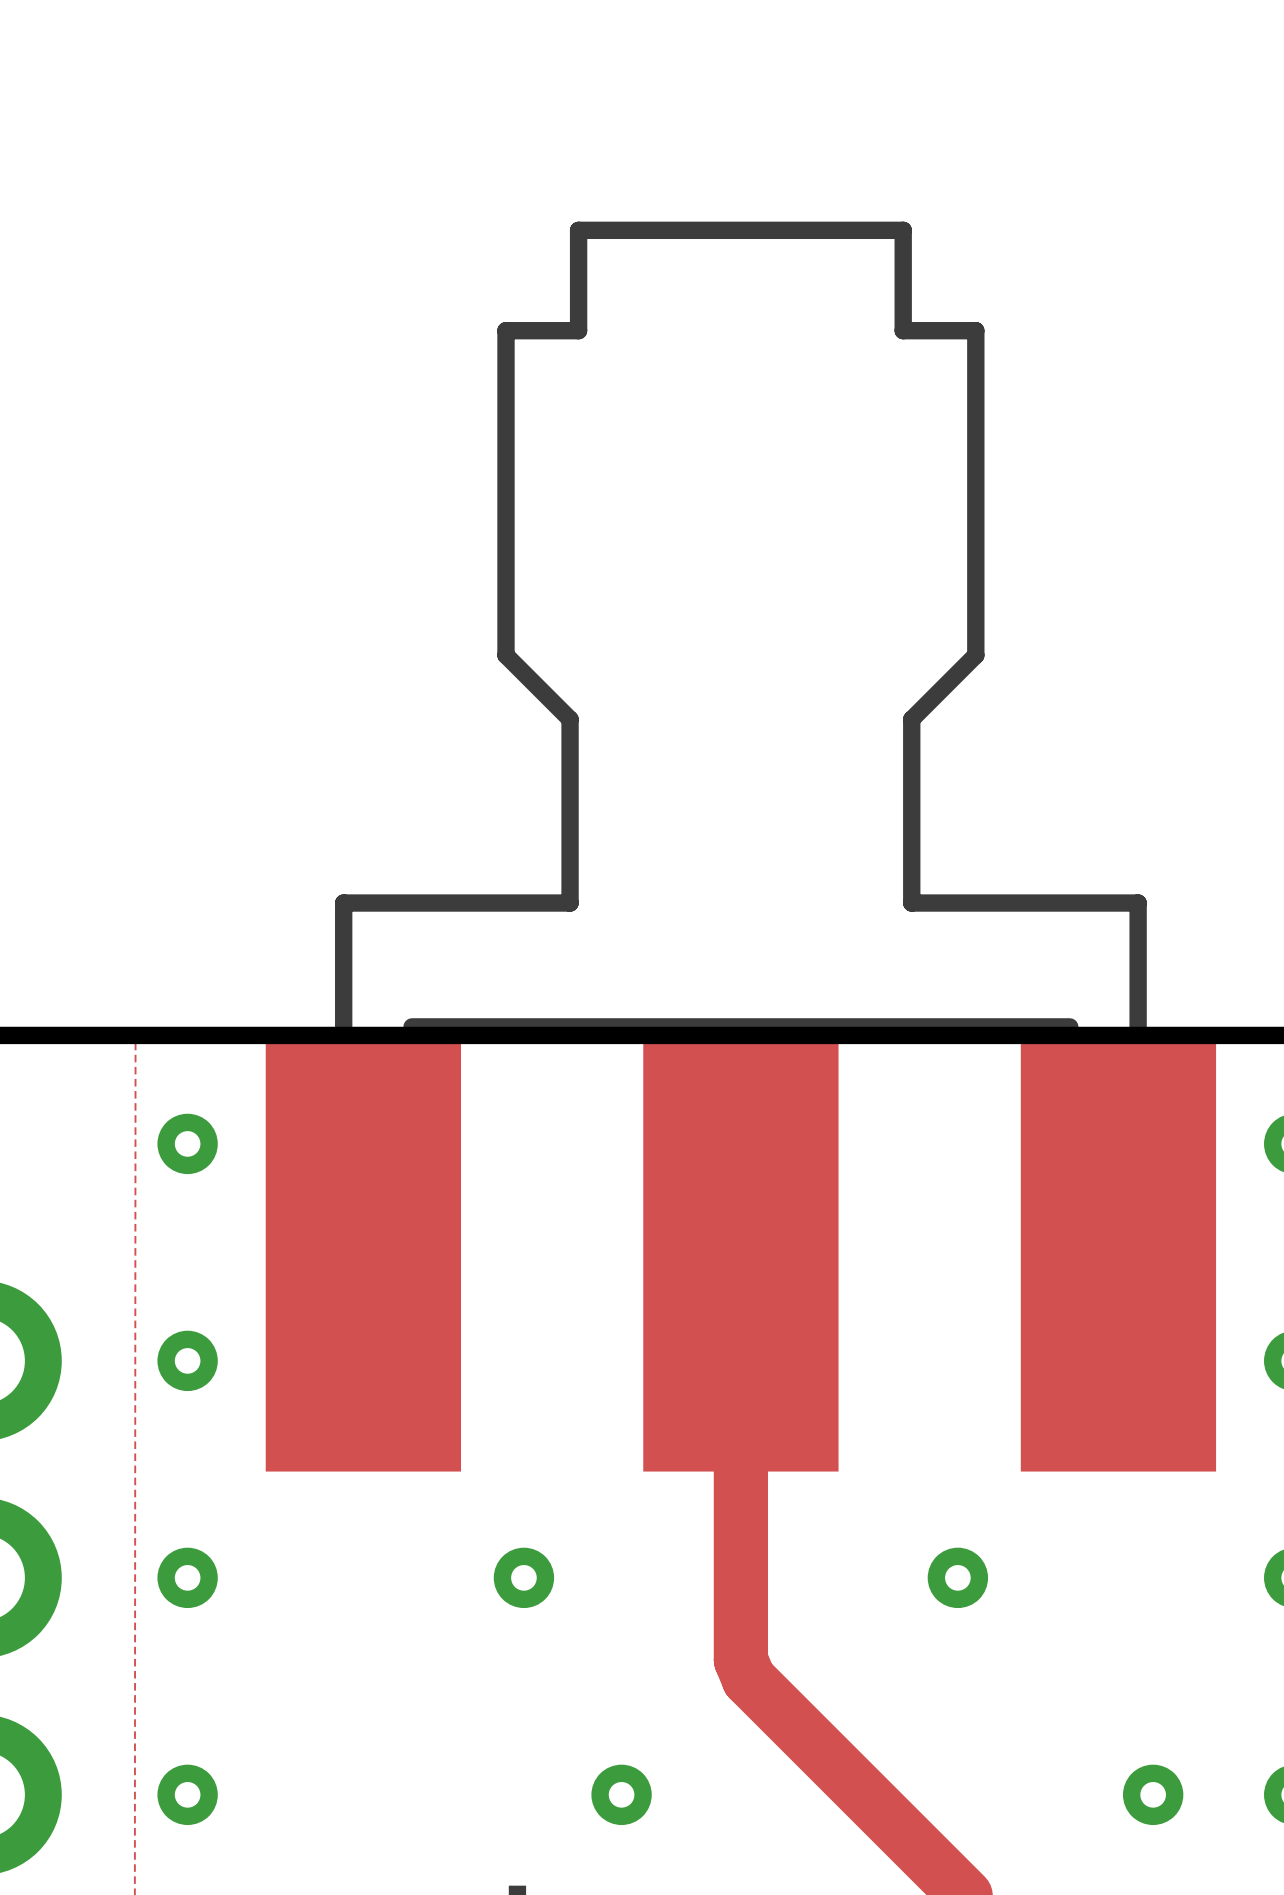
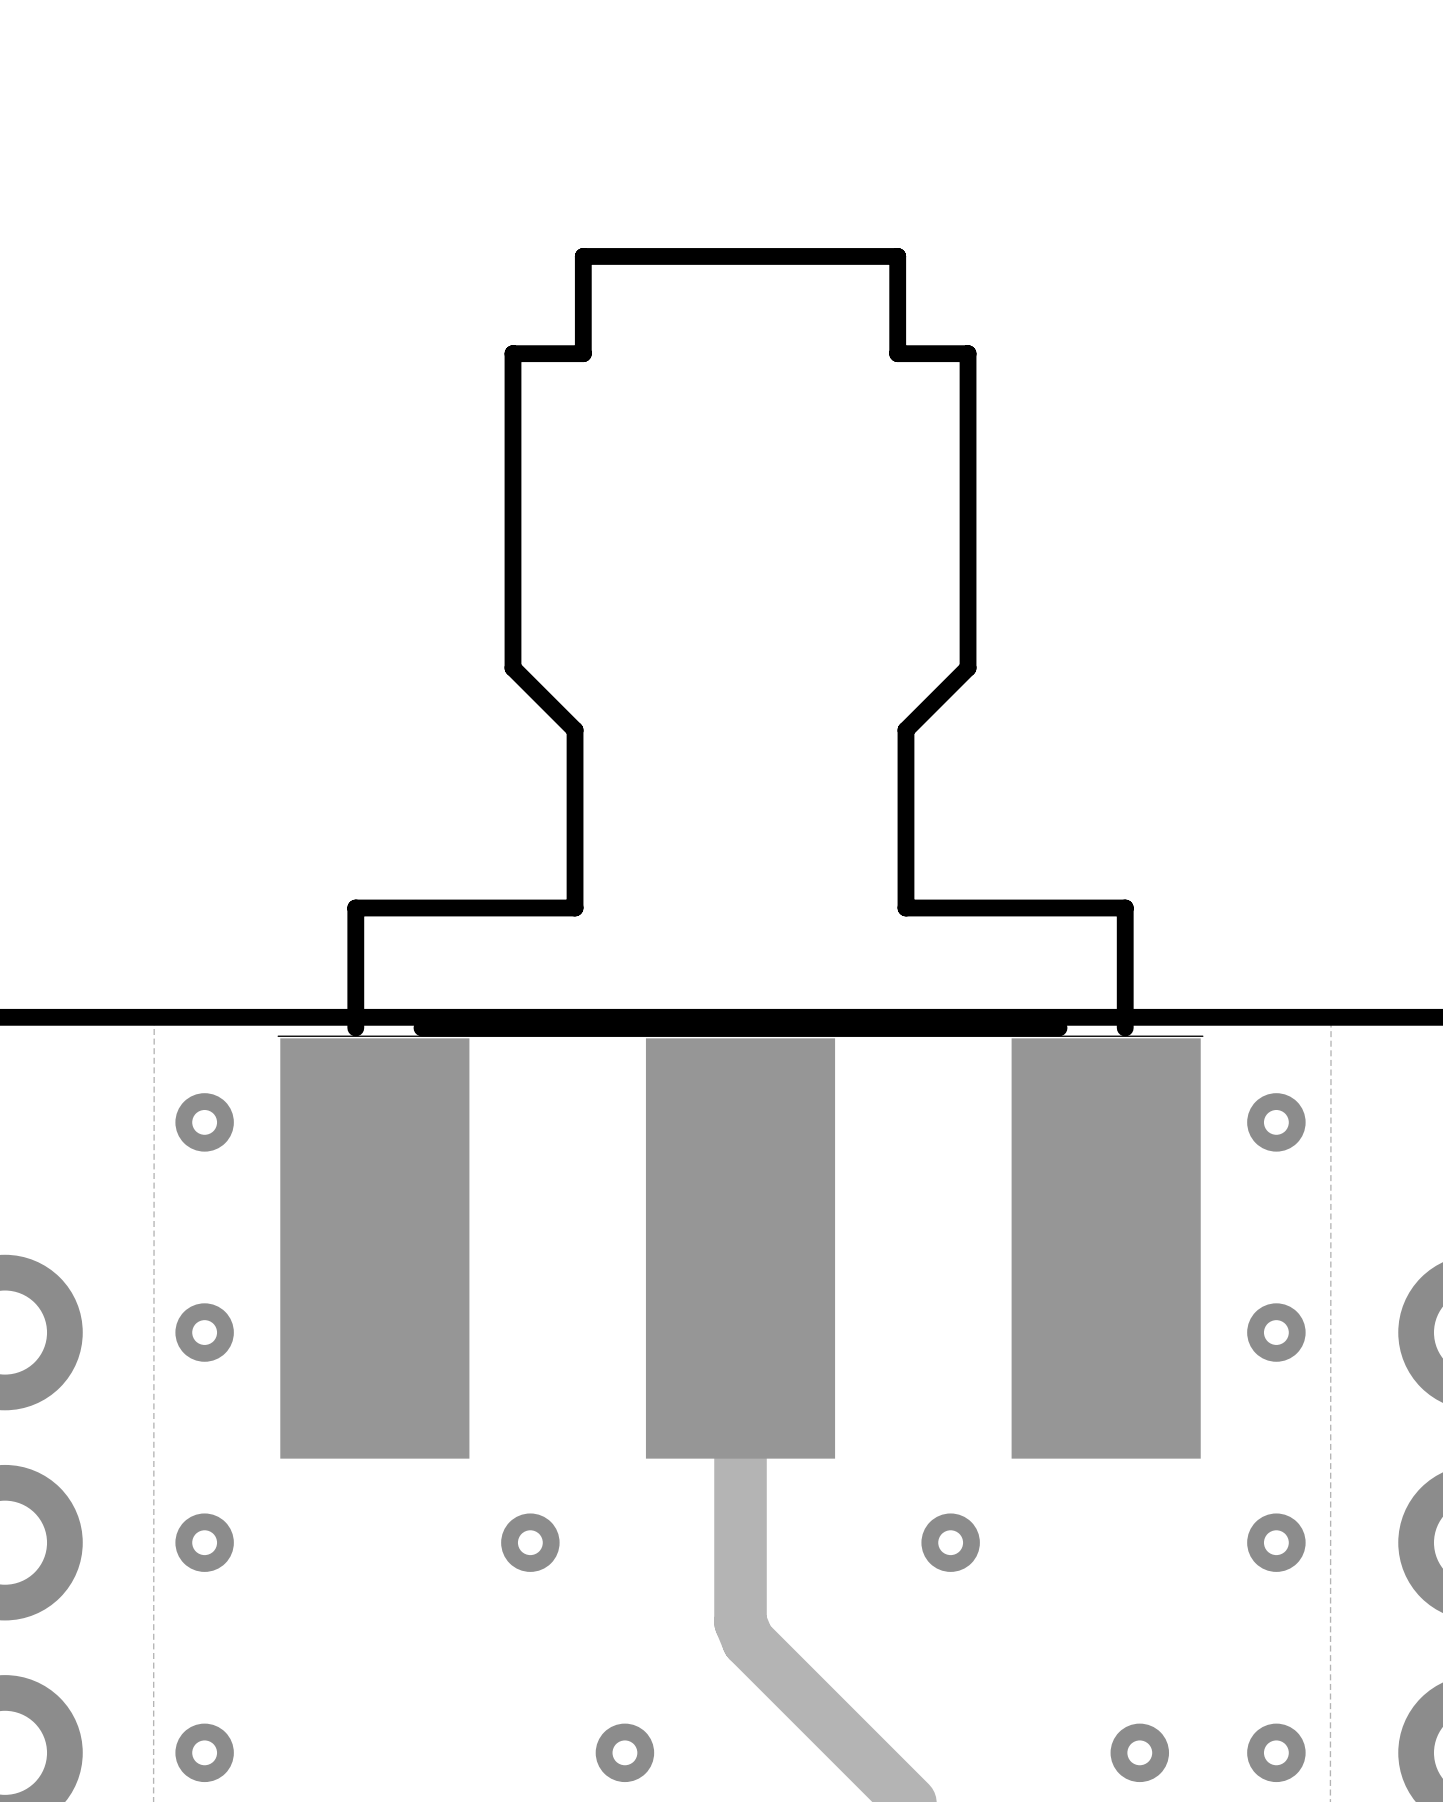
part position: (740, 846) -> (740, 853)

